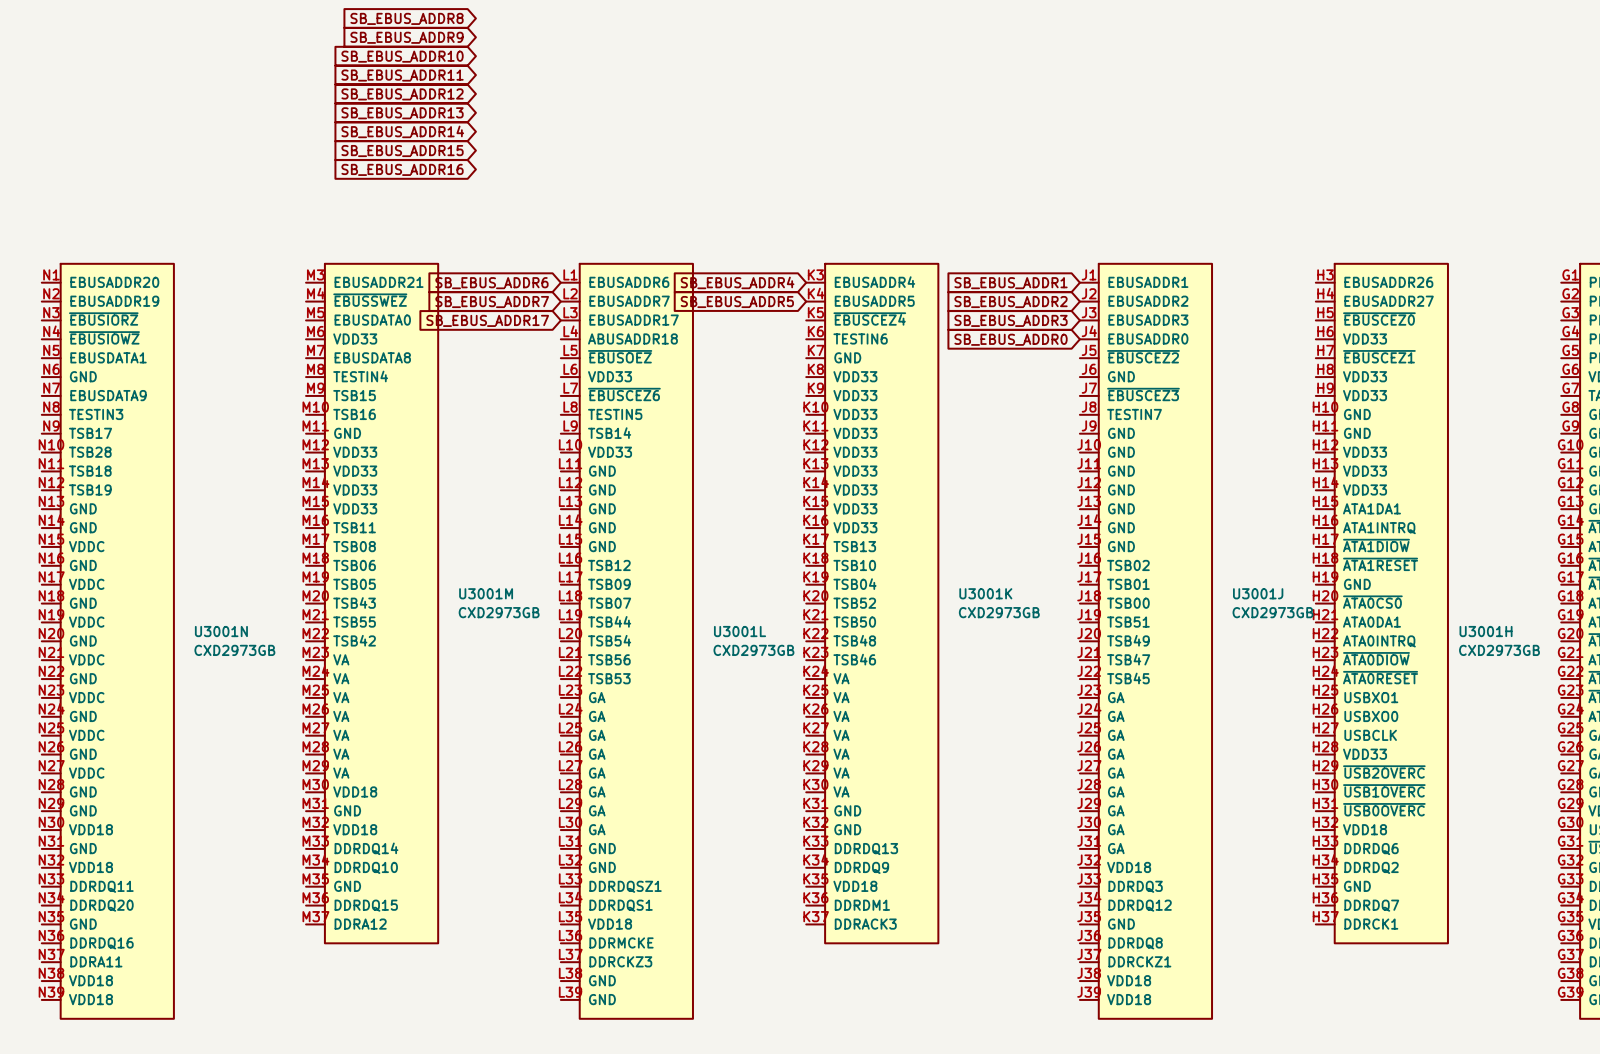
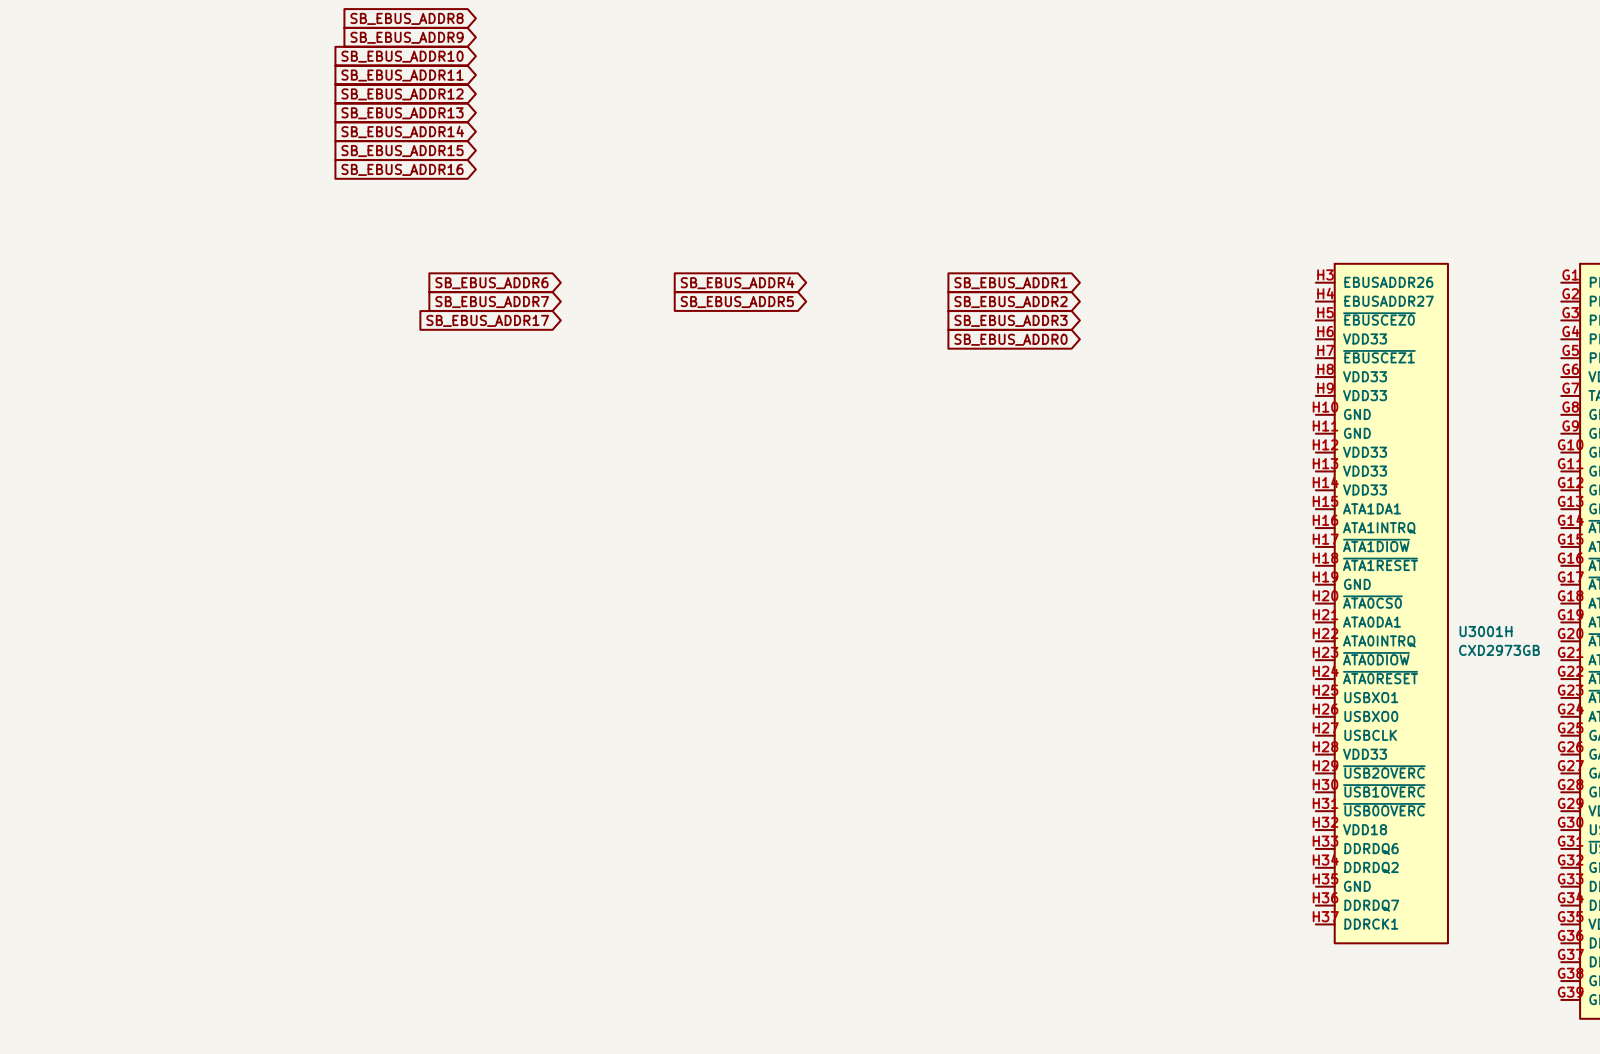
U3001M: CXD2973GB (372, 603) -> none
U3001K: CXD2973GB (872, 603) -> none
U3001N: CXD2973GB (107, 641) -> none
U3001L: CXD2973GB (626, 641) -> none
U3001J: CXD2973GB (1145, 641) -> none

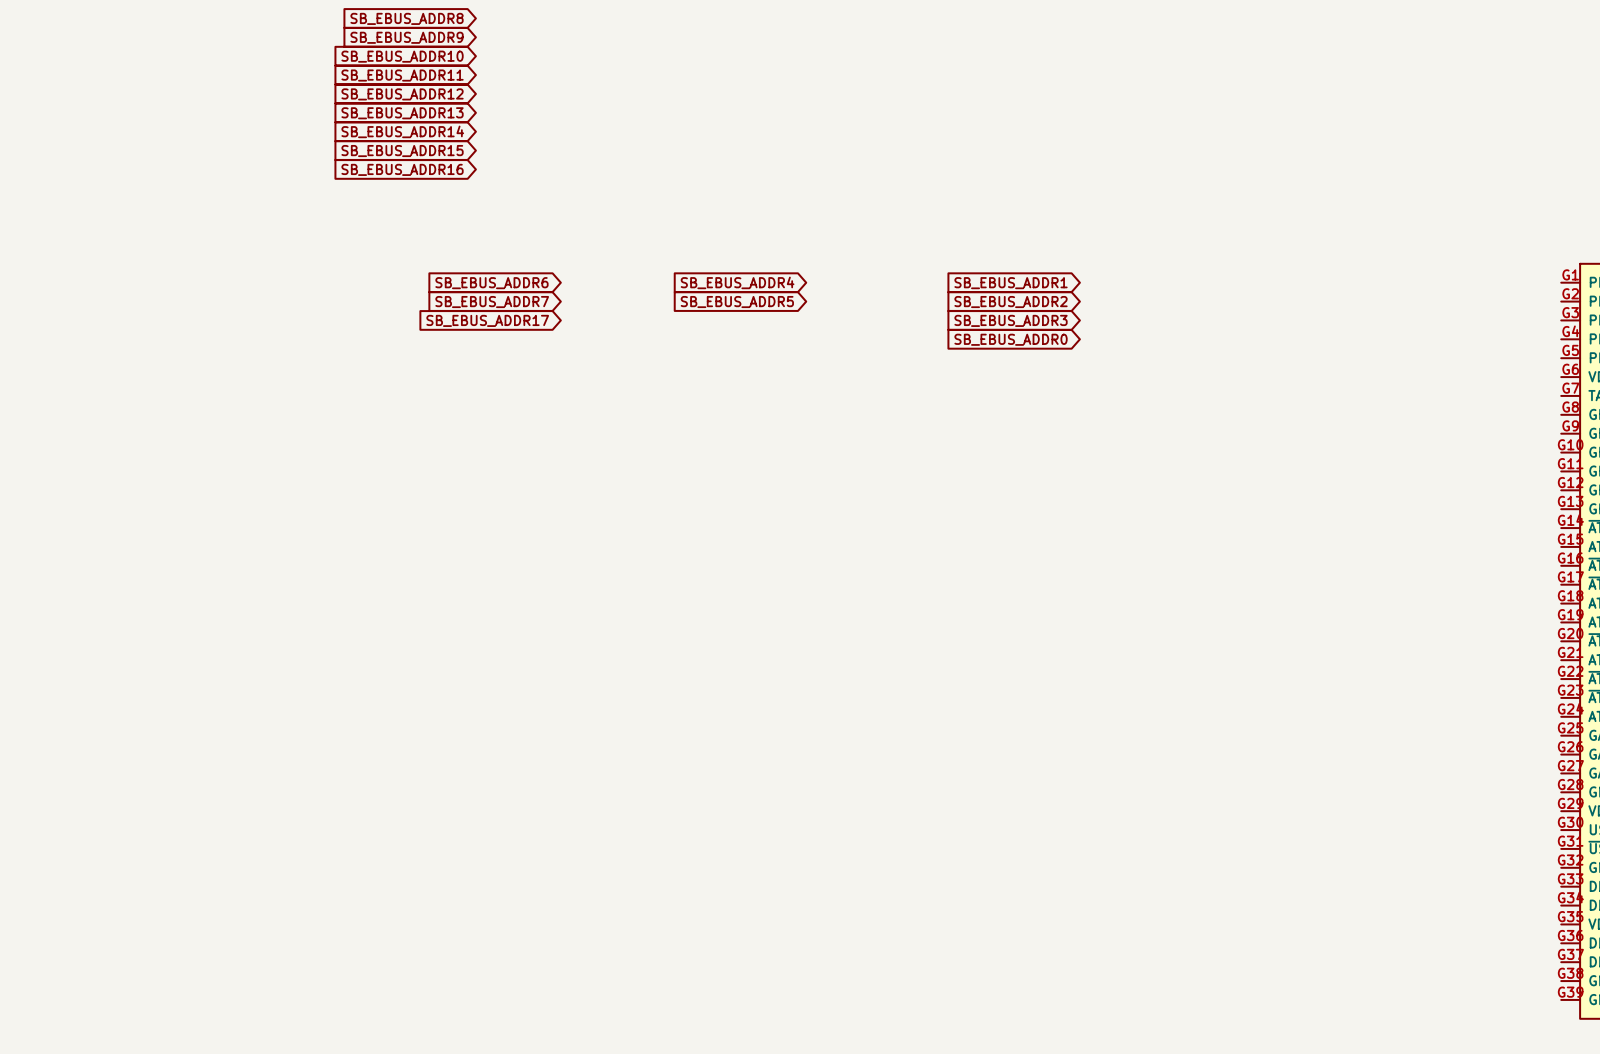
U3001H: CXD2973GB (1381, 603) -> none

